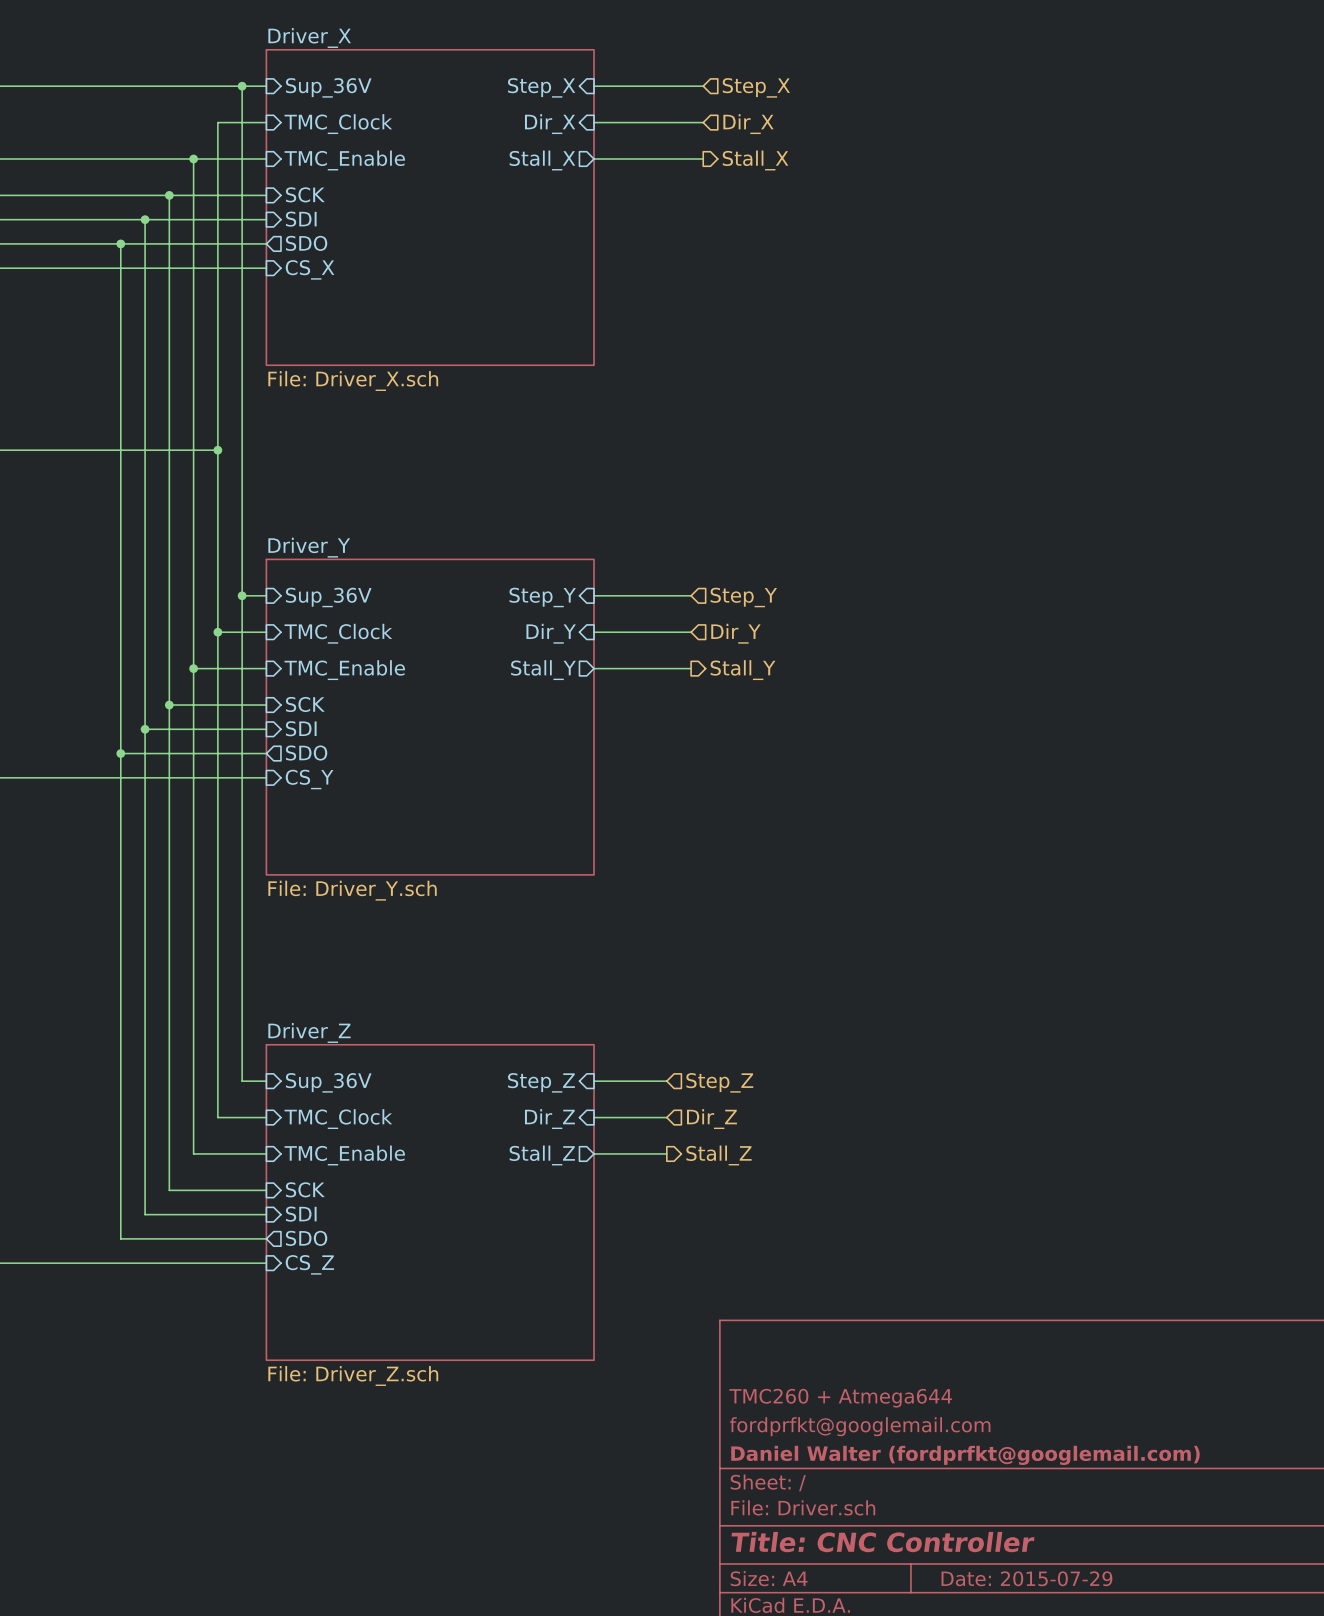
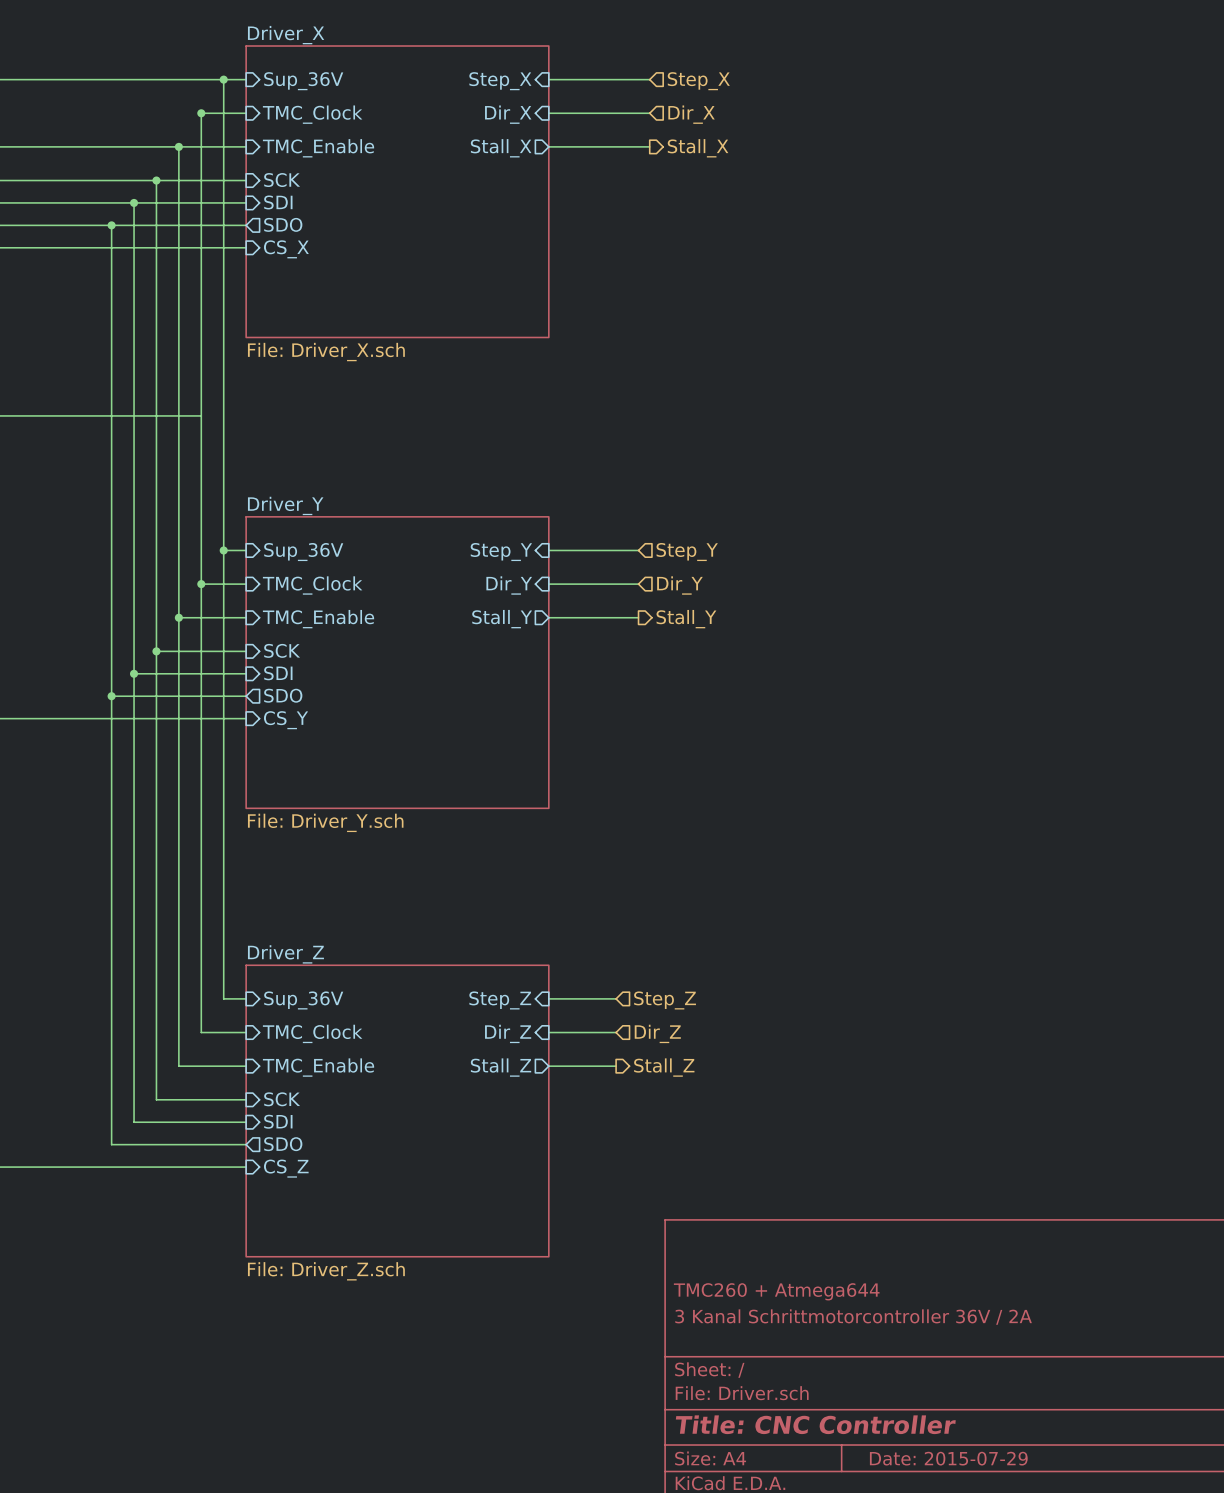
junction: none -> (201, 113)
junction: (217, 450) -> none
title block: fordprfkt@googlemail.com (860, 1426) -> 3 Kanal Schrittmotorcontroller 36V / 2A (853, 1317)
title block: Daniel Walter (fordprfkt@googlemail.com) (965, 1455) -> none

